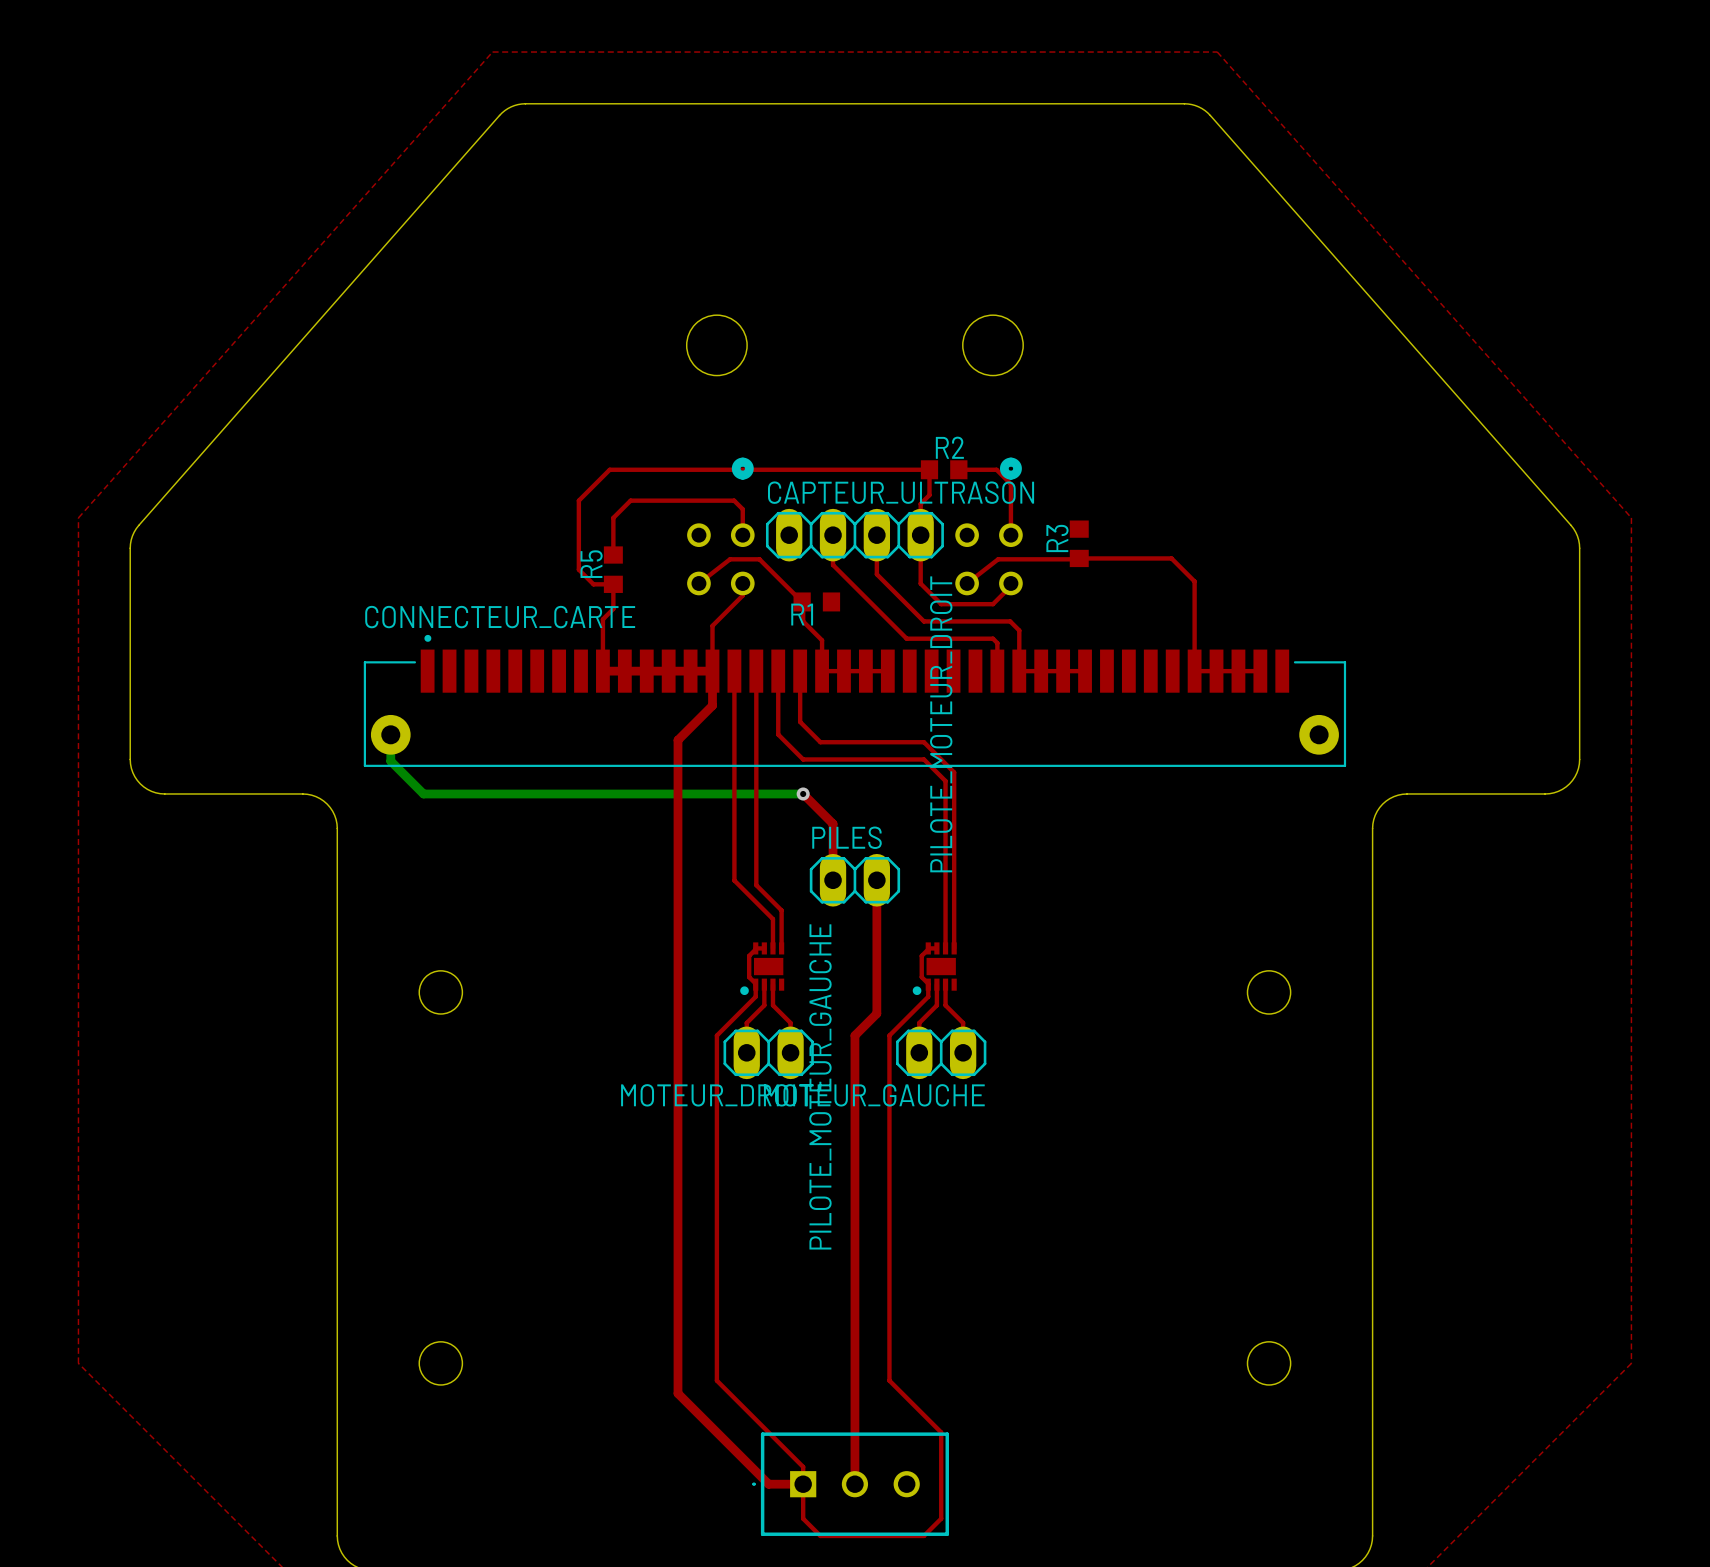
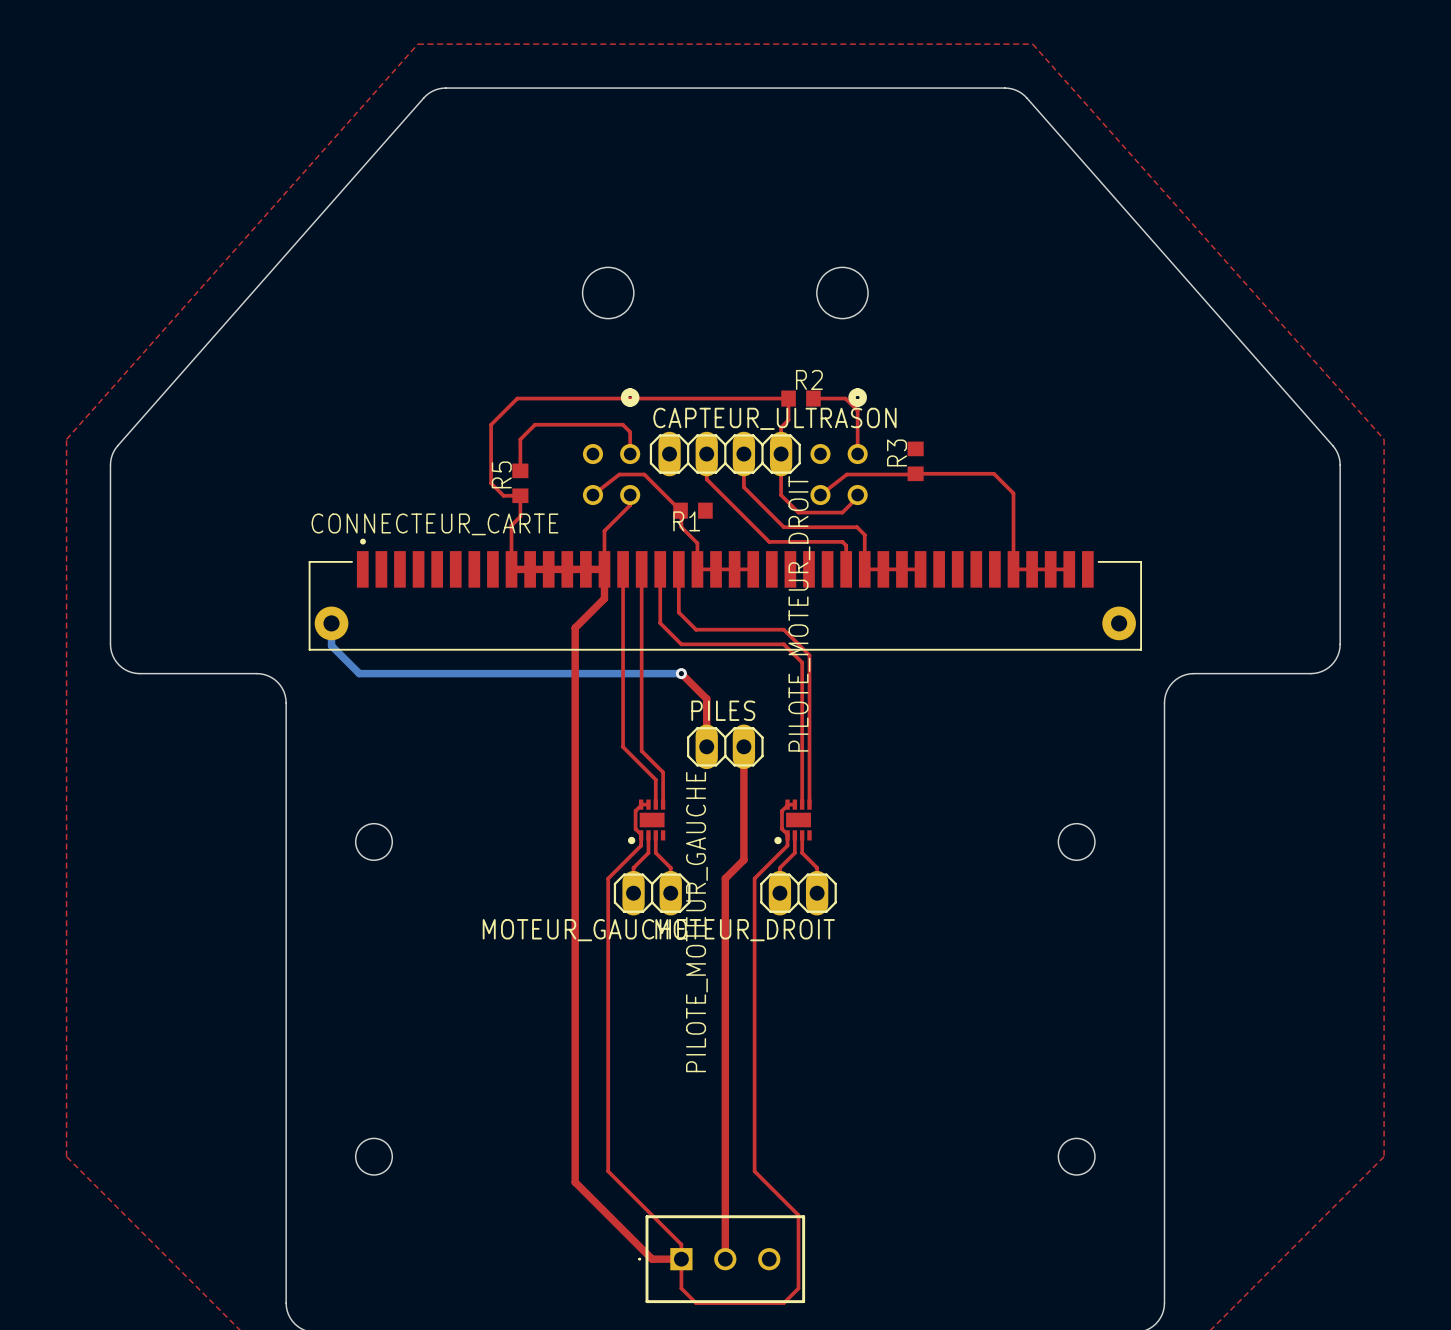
MOTEUR_DROIT name: MOTEUR_DROIT (716, 1095) -> MOTEUR_GAUCHE (584, 930)
MOTEUR_GAUCHE name: MOTEUR_GAUCHE (874, 1095) -> MOTEUR_DROIT (745, 930)

